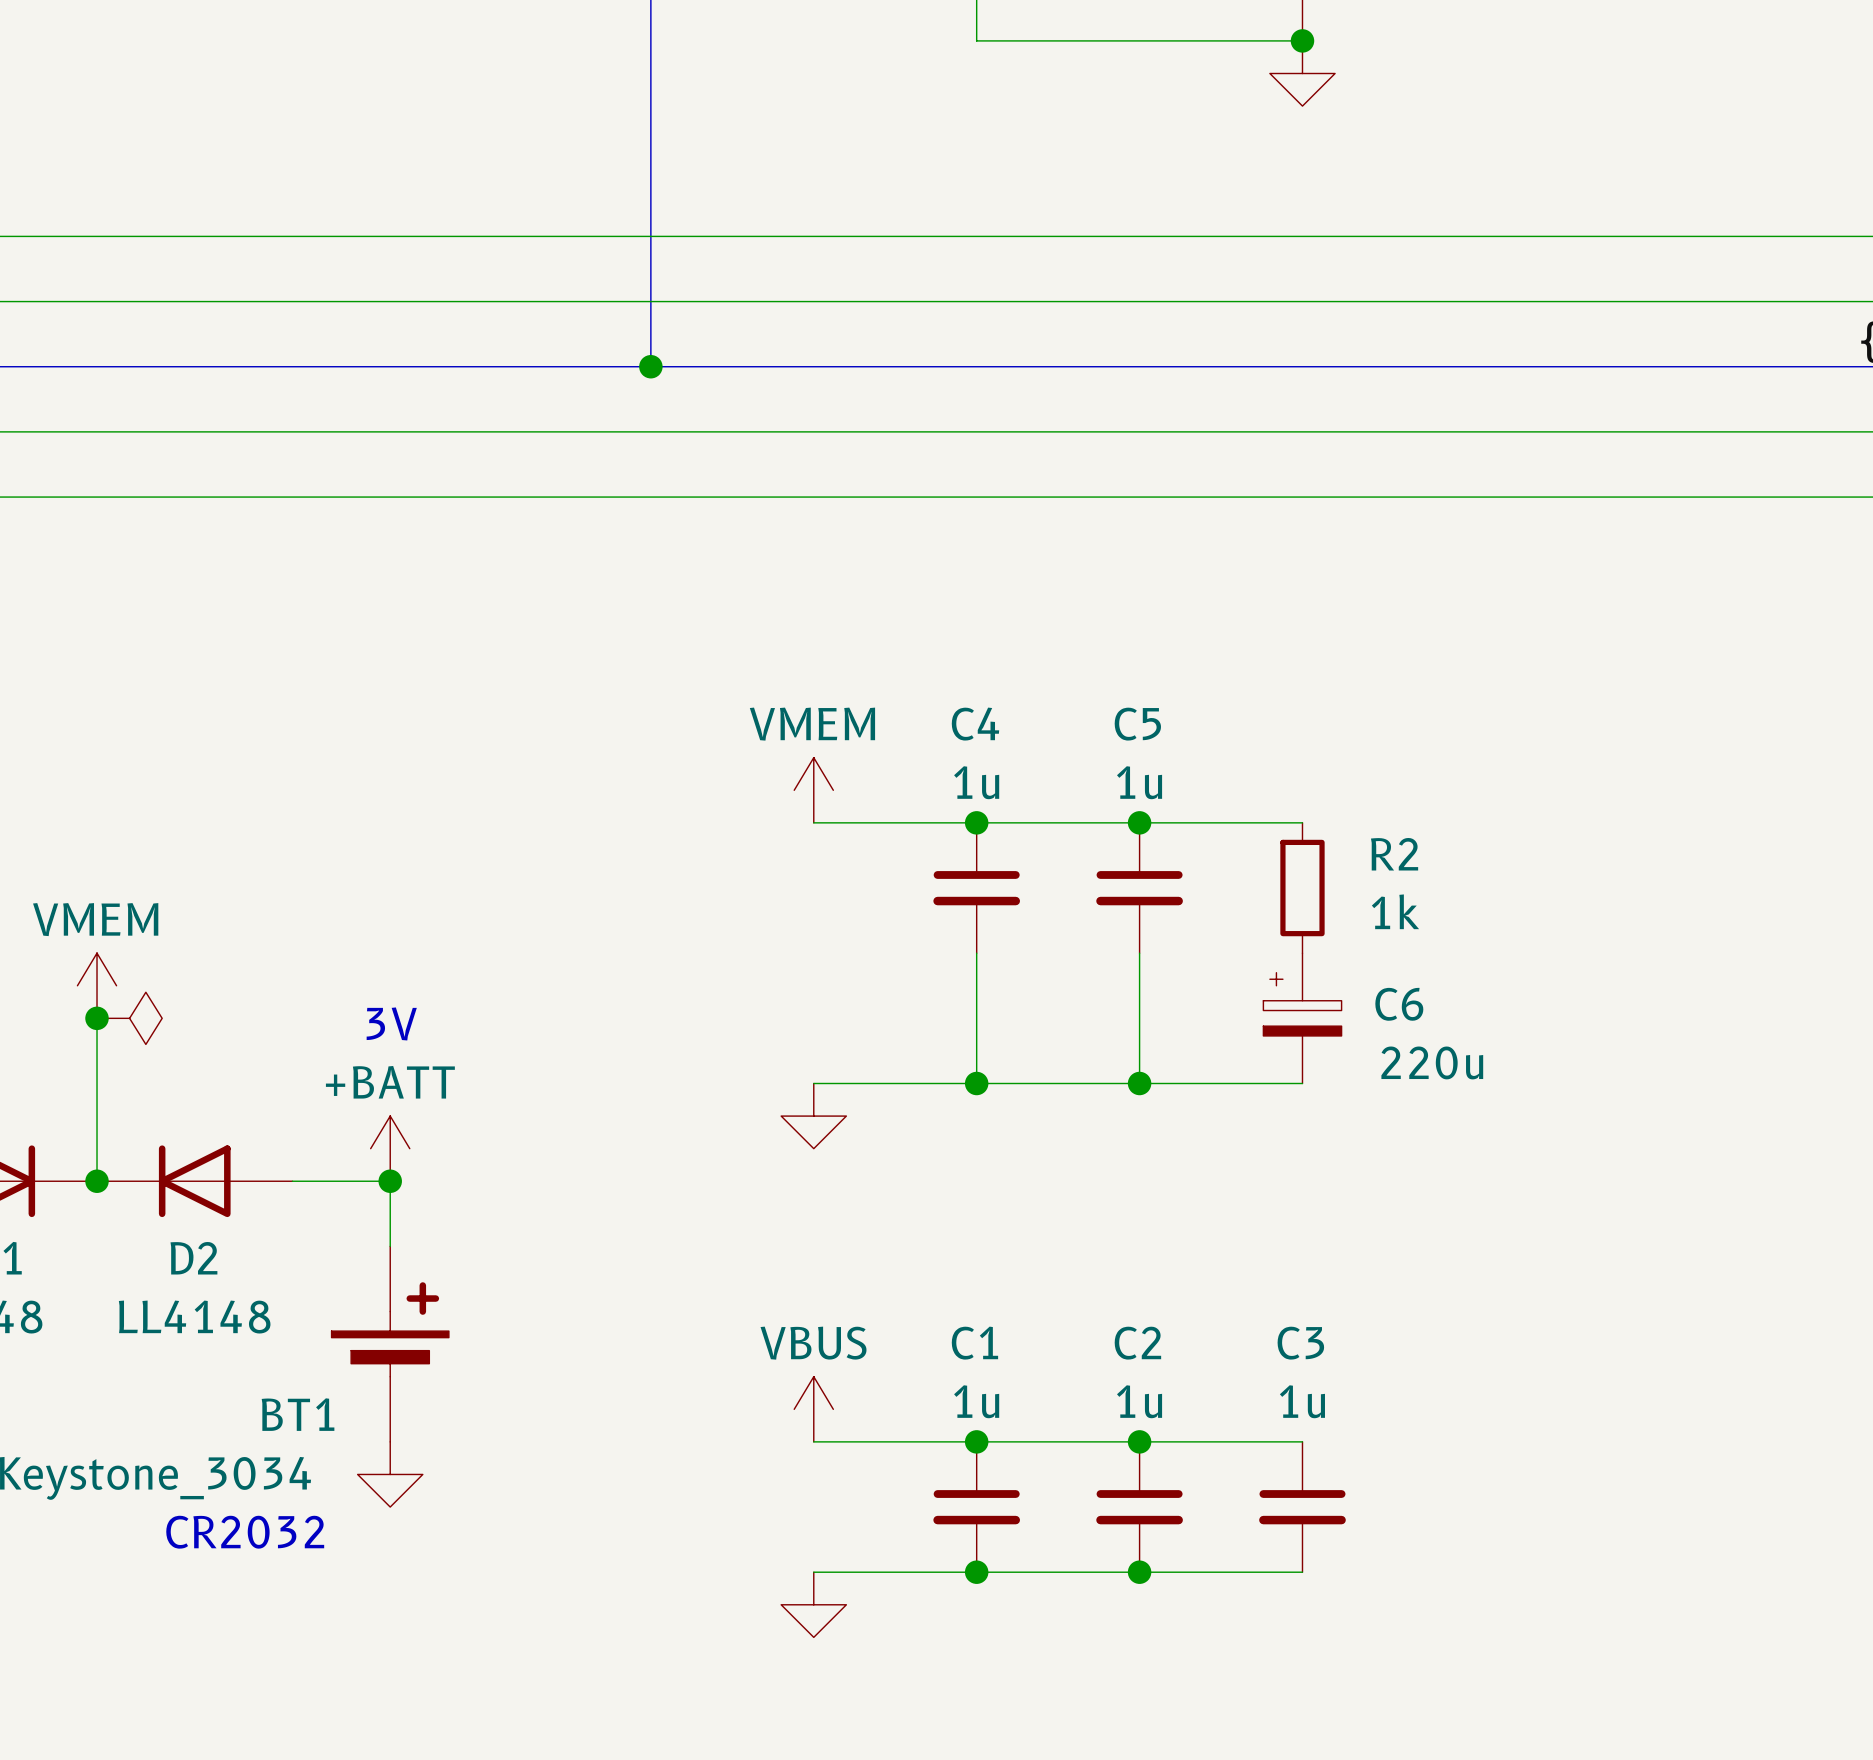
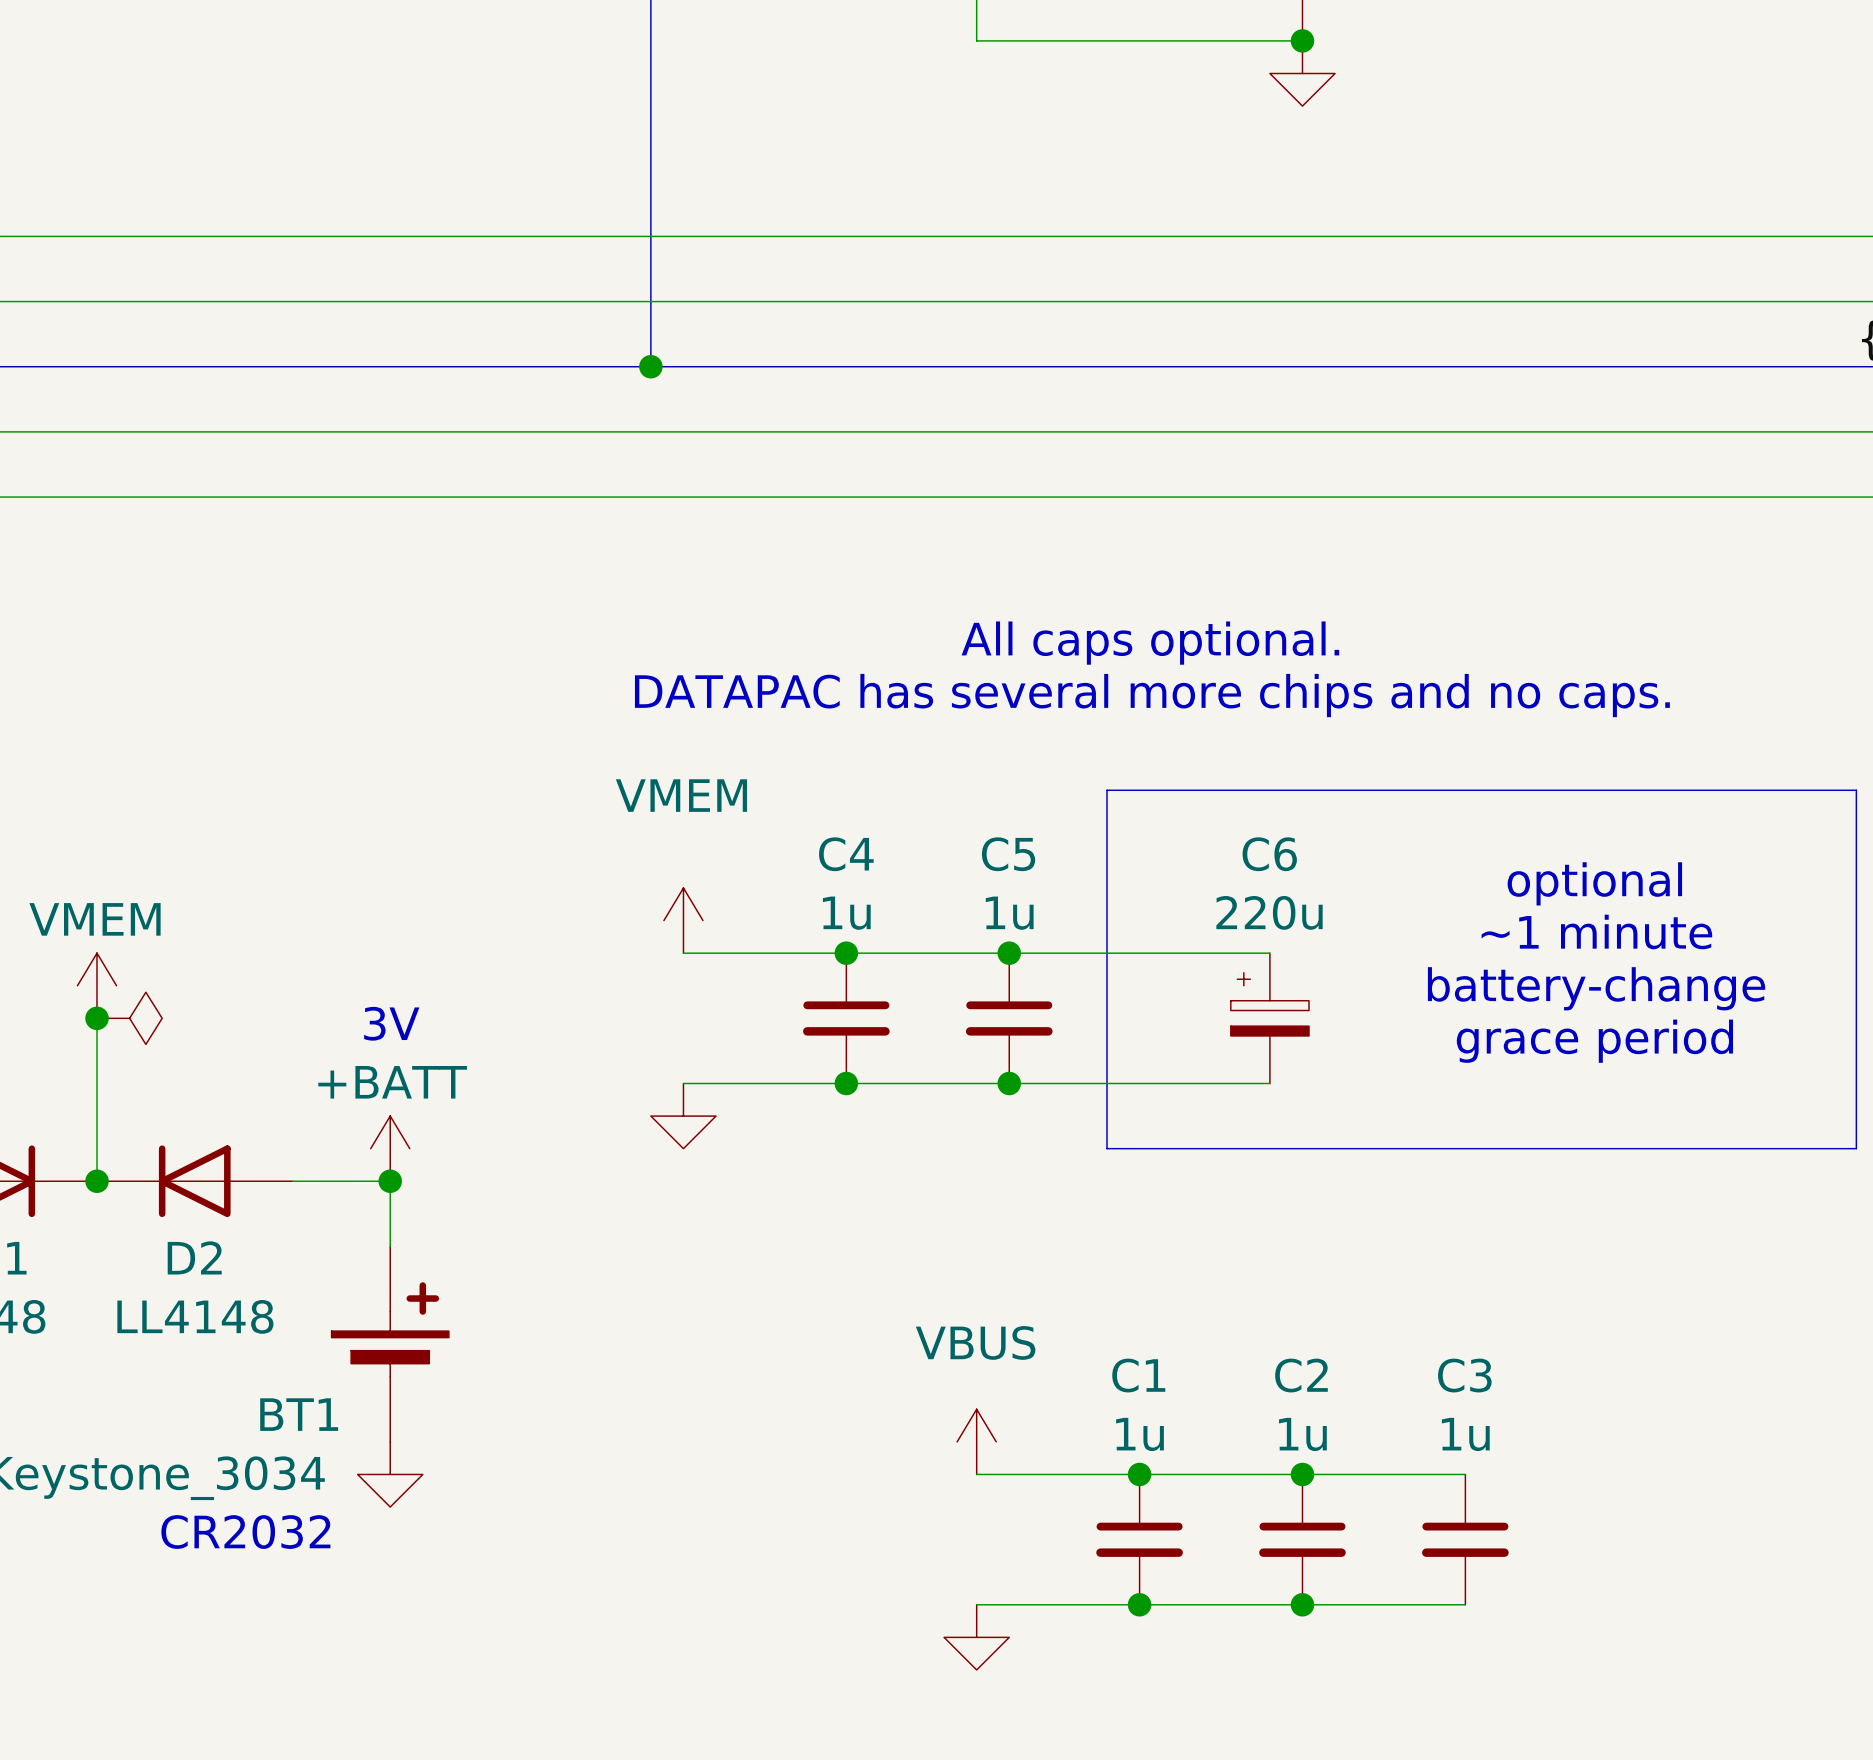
text: none -> All caps optional. (1150, 643)
text: none -> DATAPAC has several more chips and no caps. (1152, 695)
power symbol text position: VMEM (812, 724) -> VMEM (681, 795)
power symbol position: VMEM (813, 790) -> VMEM (683, 920)
line: none -> (1107, 790) (1856, 790) (1856, 1148) (1107, 1148) (1107, 790)
wire: (813, 822) (1302, 822) -> none
junction: (976, 822) -> none
junction: (1139, 822) -> none
text: none -> optional (1594, 883)
C4 position: (976, 888) -> (846, 1018)
C5 position: (1139, 888) -> (1009, 1018)
R2: 1k (1302, 888) -> none
text: none -> ~1 minute (1596, 931)
wire: none -> (683, 953) (1269, 953)
junction: none -> (846, 953)
wire: (976, 953) (976, 1083) -> none
junction: none -> (1009, 953)
wire: (1139, 953) (1139, 1083) -> none
text: none -> battery-change (1596, 988)
C6 name position: C6 (1399, 1004) -> C6 (1269, 854)
C6 position: (1302, 1018) -> (1269, 1018)
text: none -> grace period (1594, 1041)
C6 value position: 220u (1432, 1062) -> 220u (1269, 912)
wire: none -> (683, 1083) (813, 1083)
junction: none -> (846, 1083)
junction position: (976, 1083) -> (1009, 1083)
junction: (1139, 1083) -> none
wire: (1269, 1083) (1302, 1083) -> none
power symbol position: (813, 1116) -> (683, 1116)
power symbol text position: VBUS (813, 1343) -> VBUS (975, 1342)
power symbol position: VBUS (813, 1409) -> VBUS (976, 1441)
wire: (813, 1441) (1302, 1441) -> (976, 1474) (1465, 1474)
junction: (976, 1441) -> none
junction position: (1139, 1441) -> (1139, 1474)
junction: none -> (1302, 1474)
C1 position: (976, 1507) -> (1139, 1539)
C2 position: (1139, 1507) -> (1302, 1539)
C3 position: (1302, 1507) -> (1465, 1539)
wire: (813, 1572) (1302, 1572) -> (976, 1604) (1465, 1604)
junction: (976, 1572) -> none
junction position: (1139, 1572) -> (1139, 1604)
power symbol position: (813, 1604) -> (976, 1637)
junction: none -> (1302, 1604)

